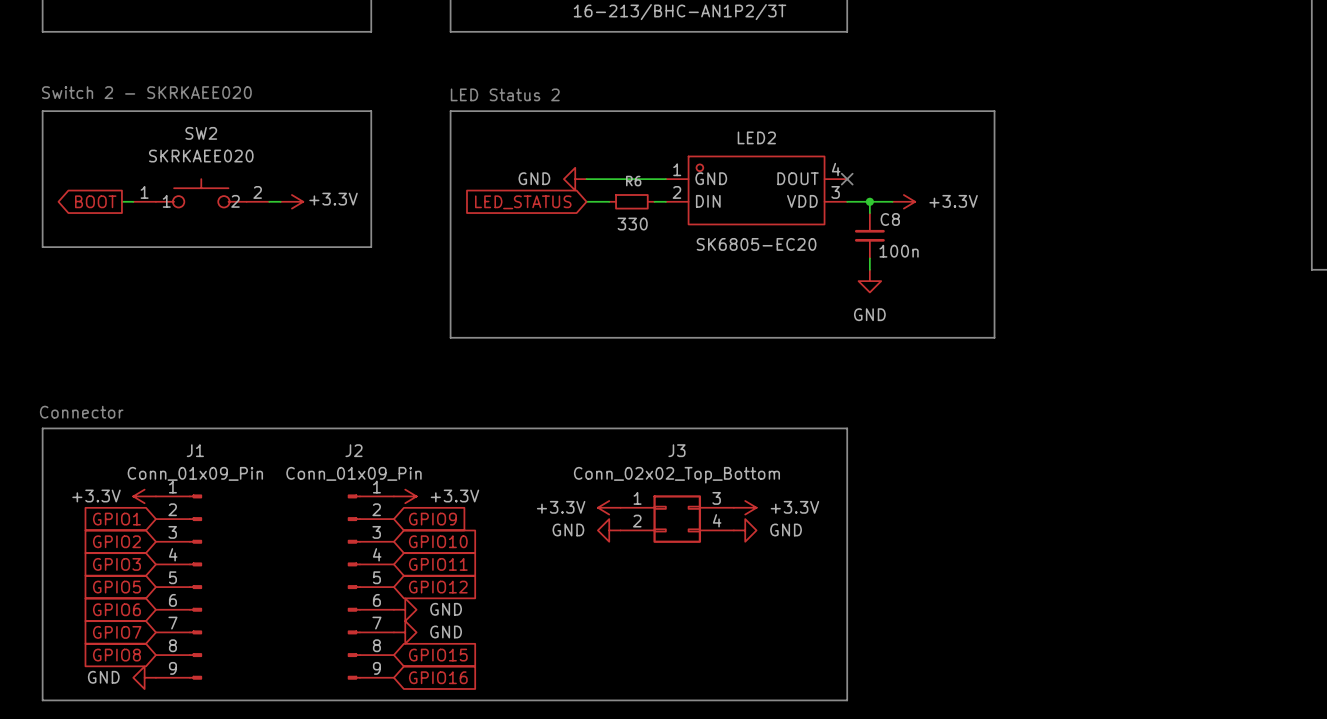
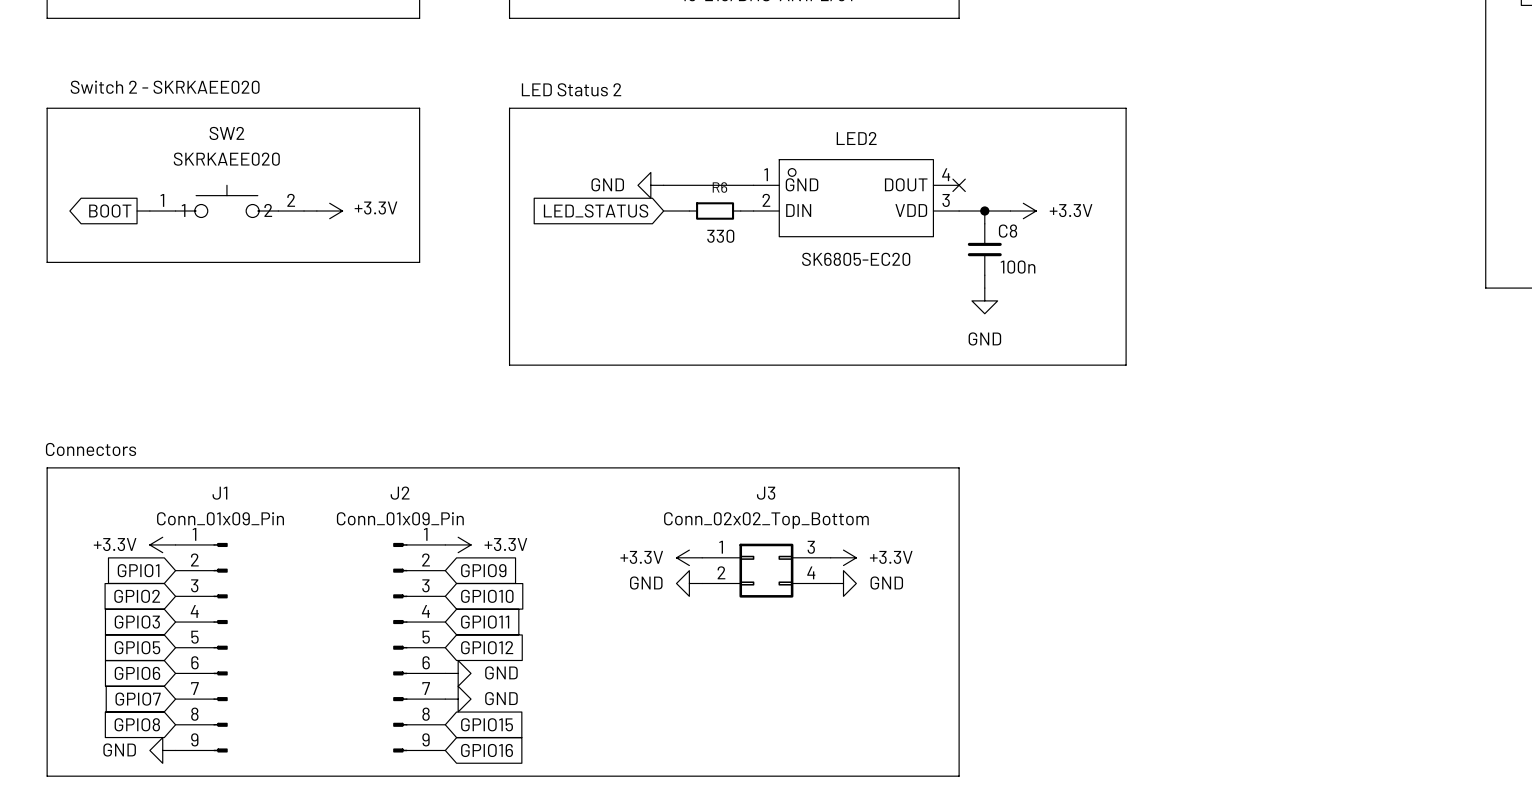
text: Connector (81, 412) -> Connectors (91, 449)

